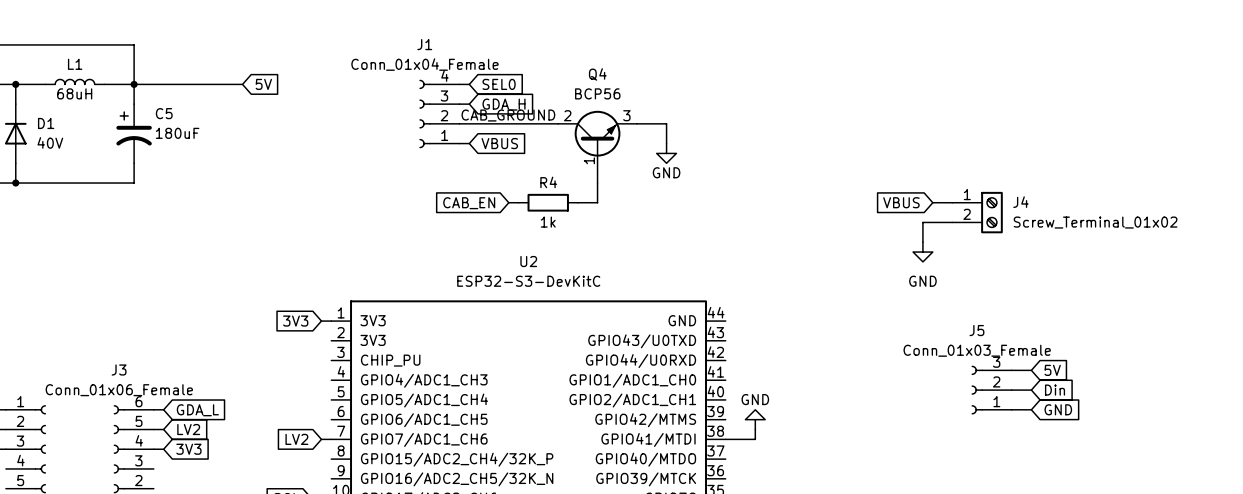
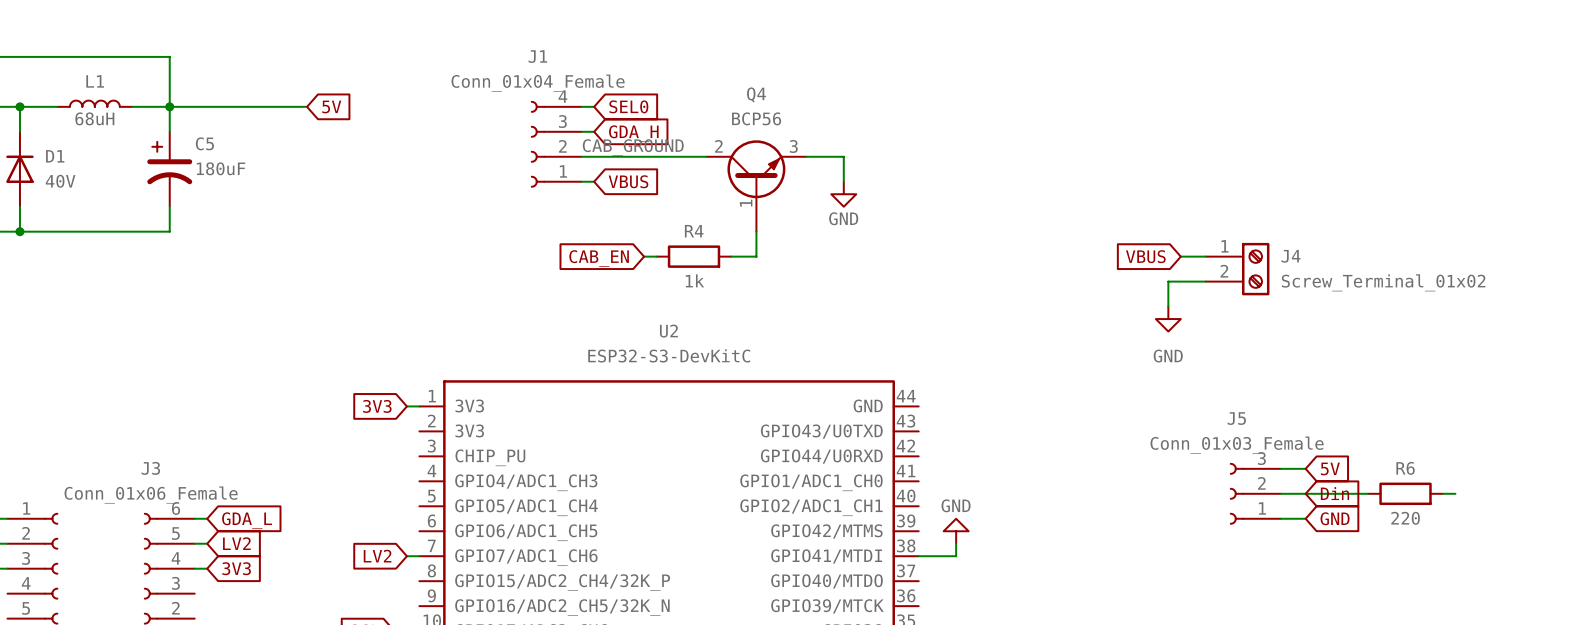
wire: none -> (1305, 493) (1368, 493)
R6: none -> 220 (1405, 493)
wire: none -> (1442, 493) (1455, 493)

